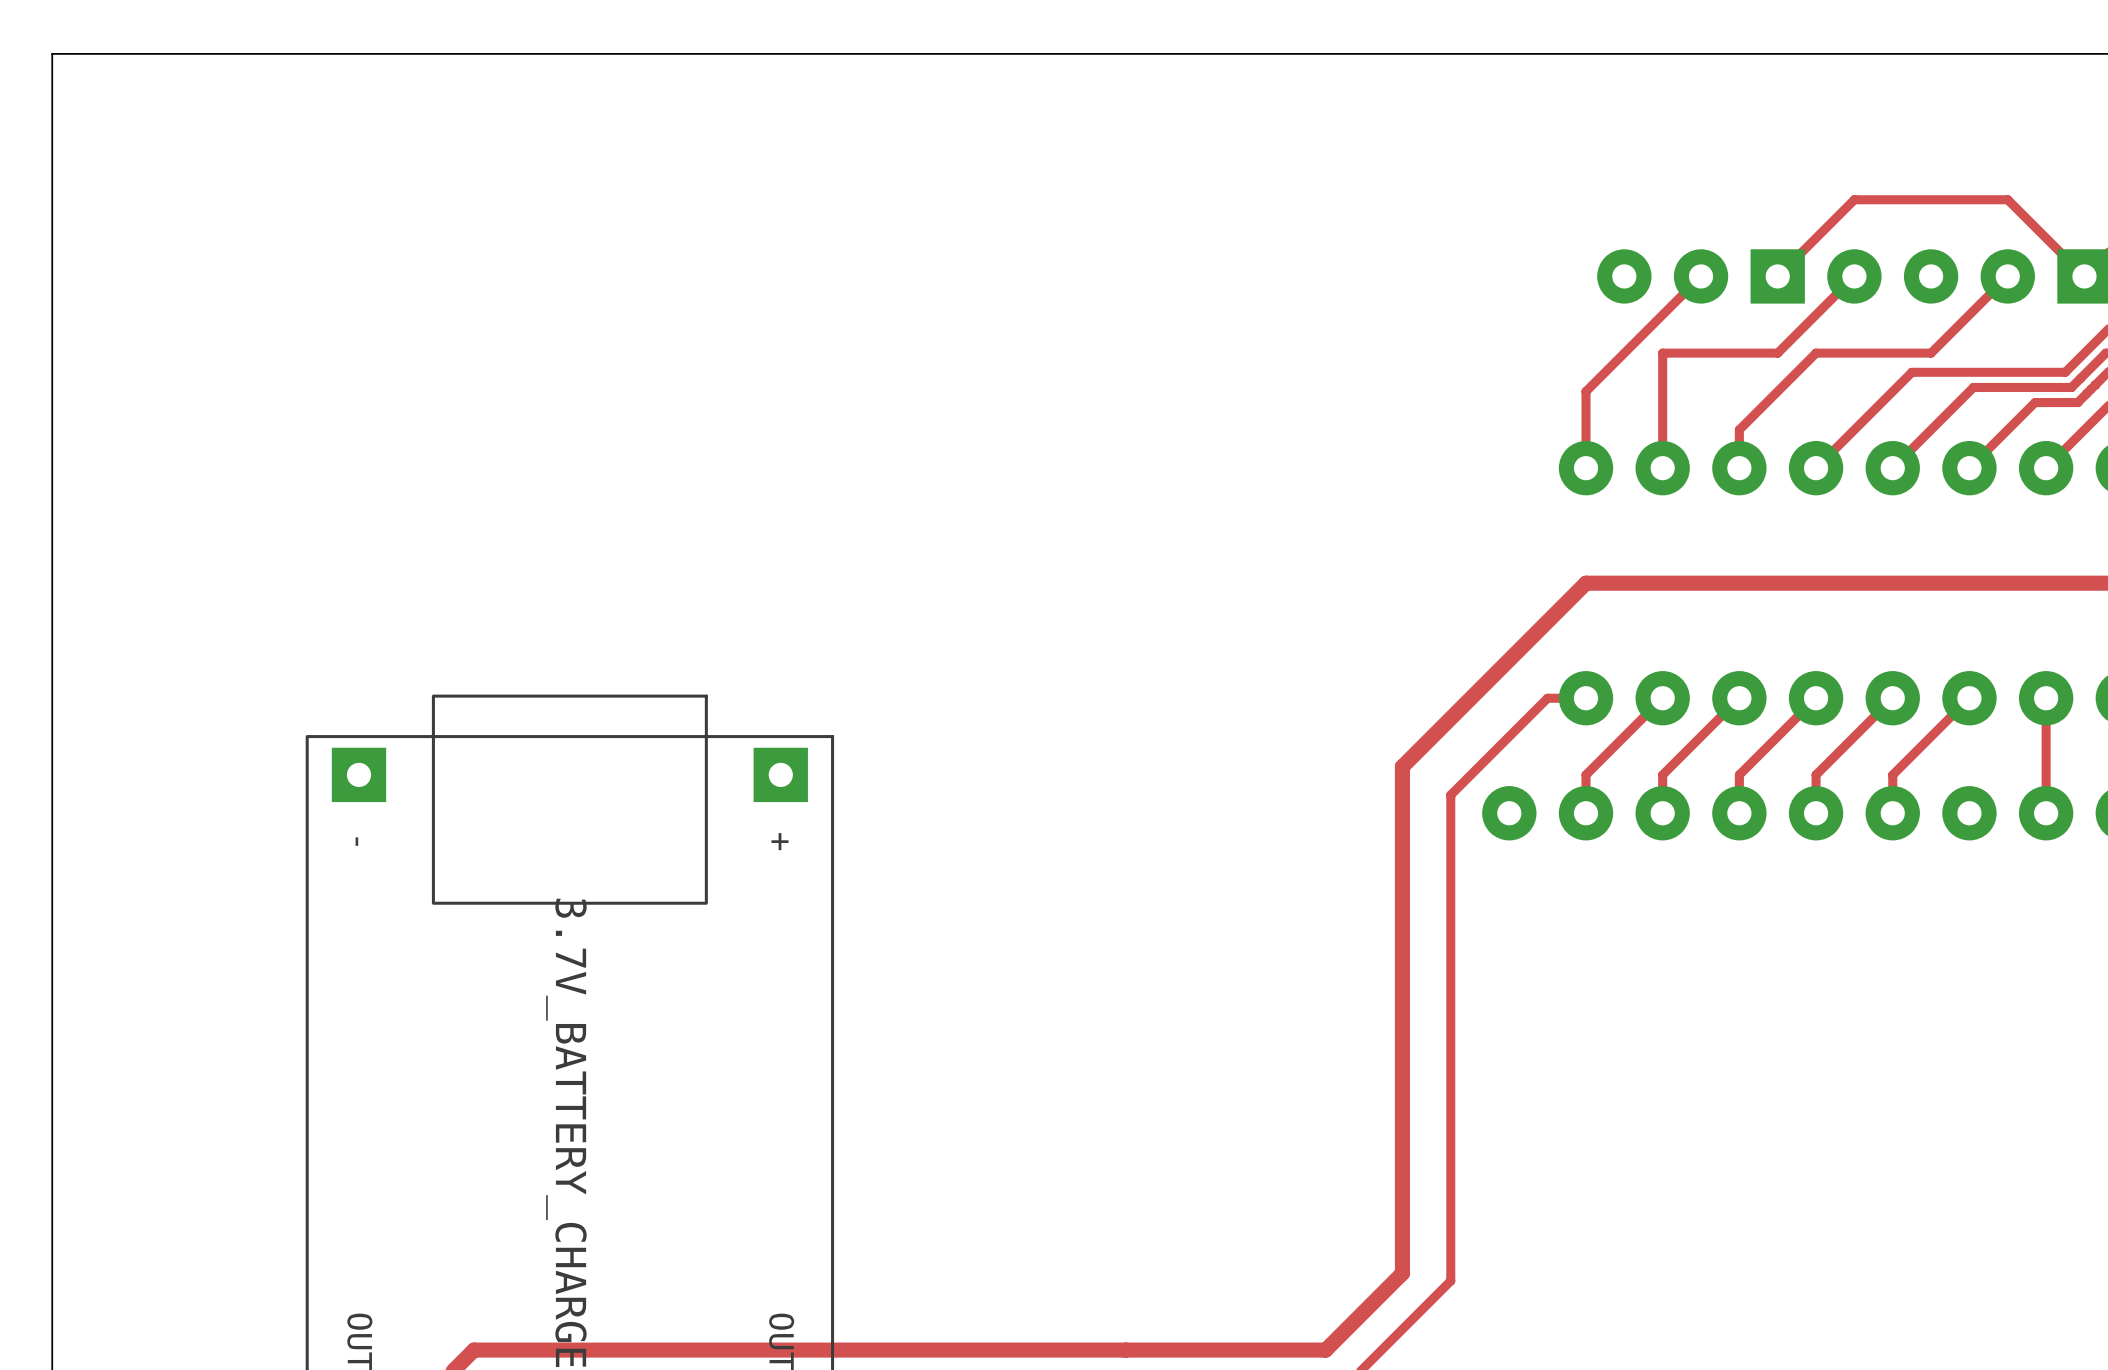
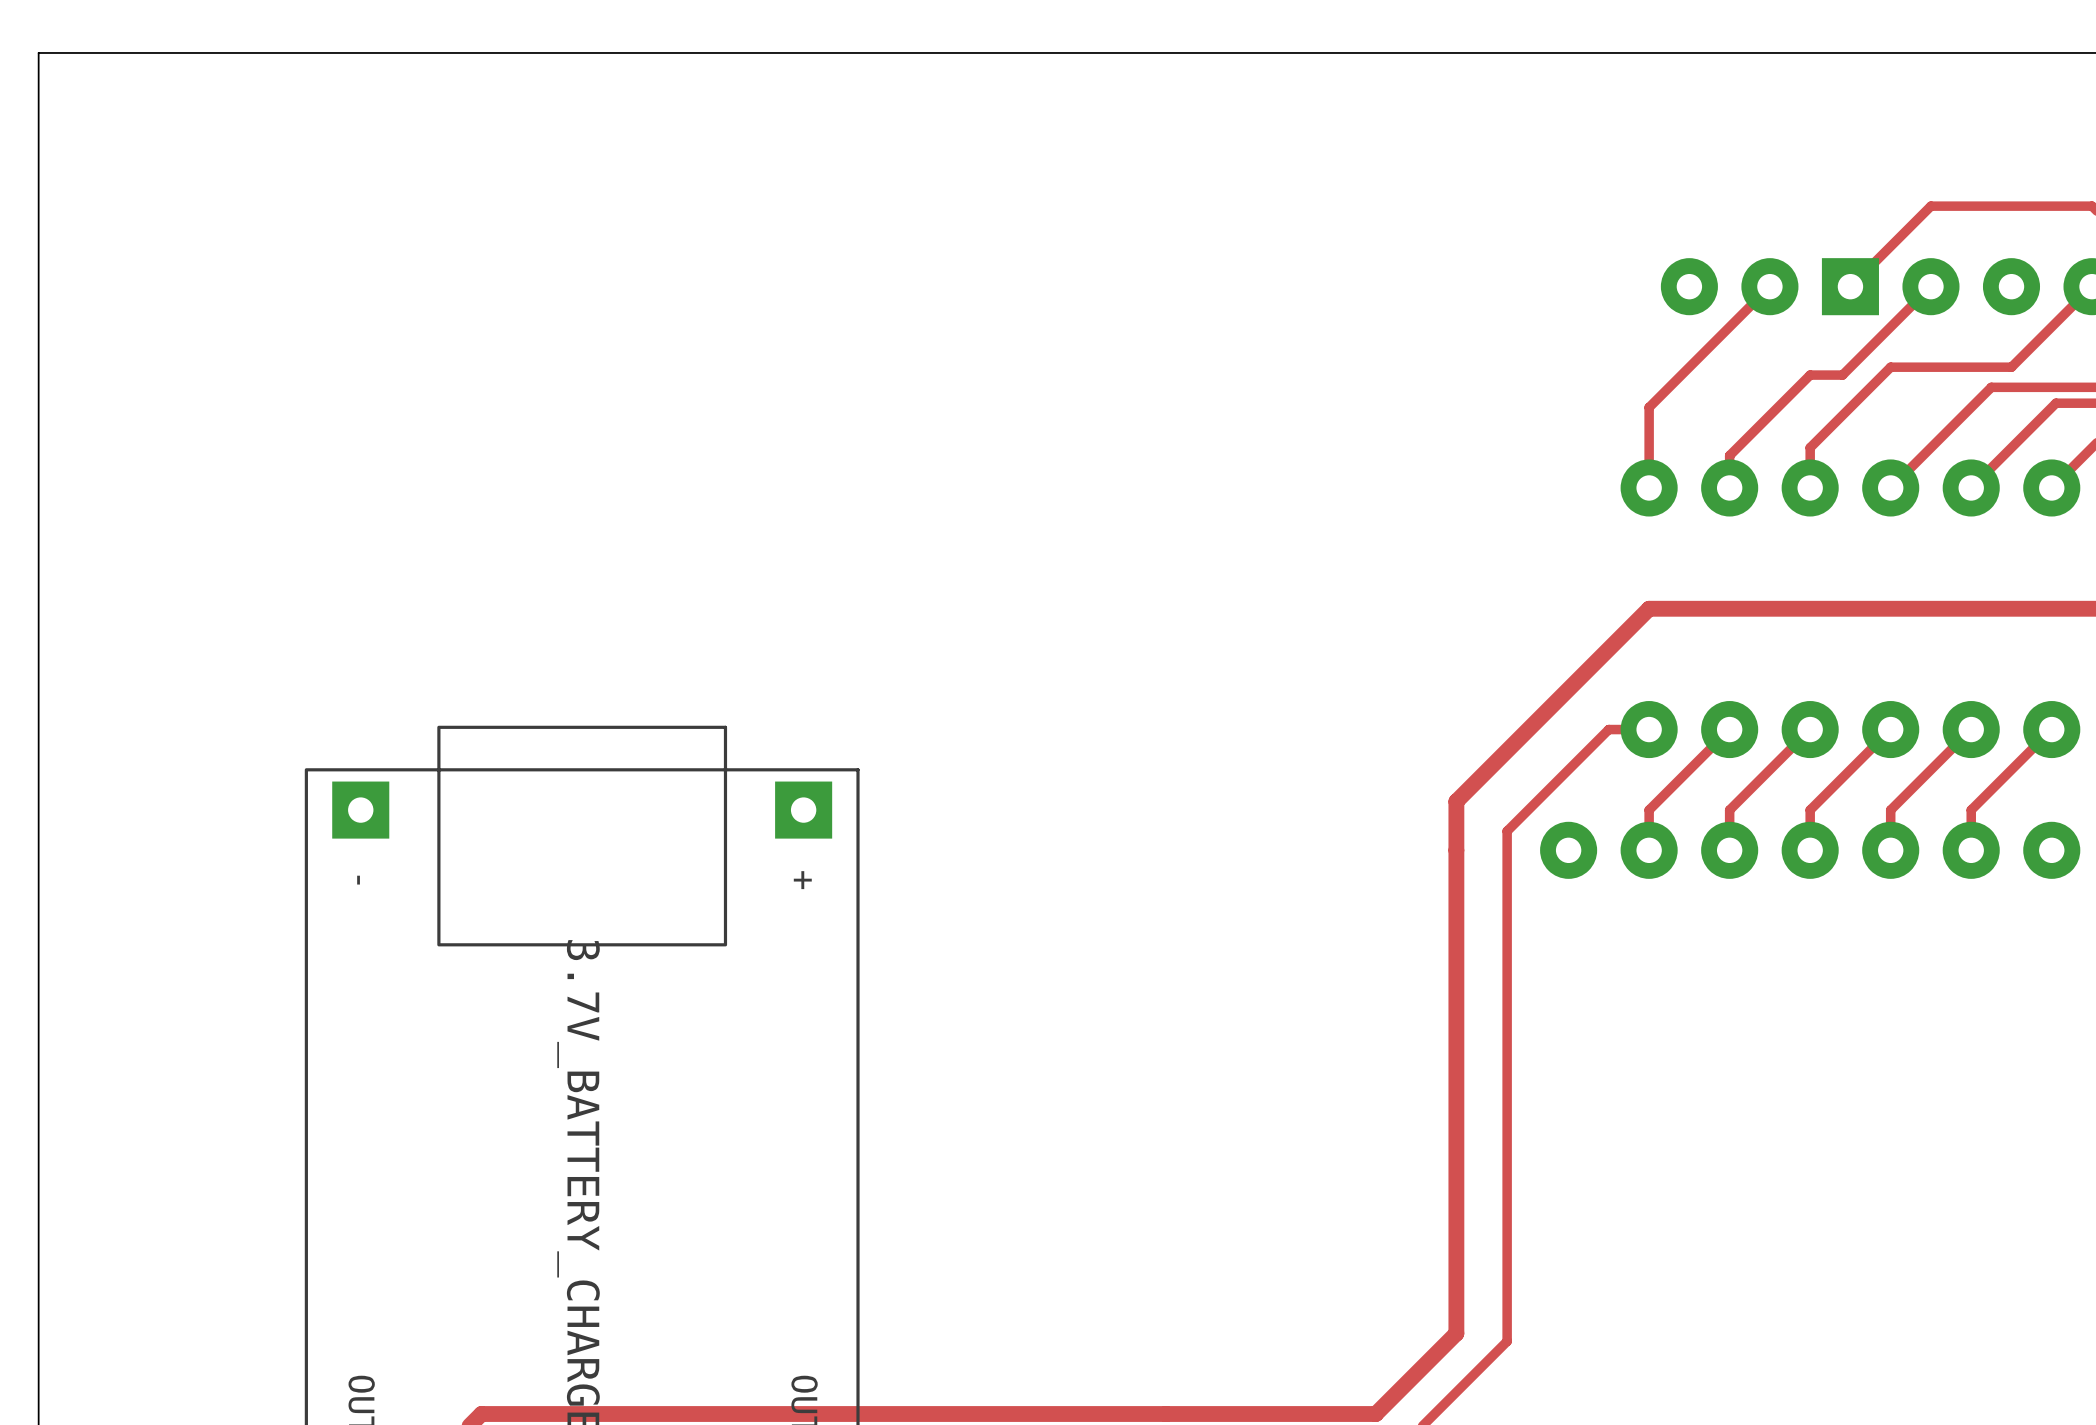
top track: (1777, 353) (1662, 353) (1662, 437) -> (1850, 367) (1842, 375) (1810, 375) (1729, 455)

